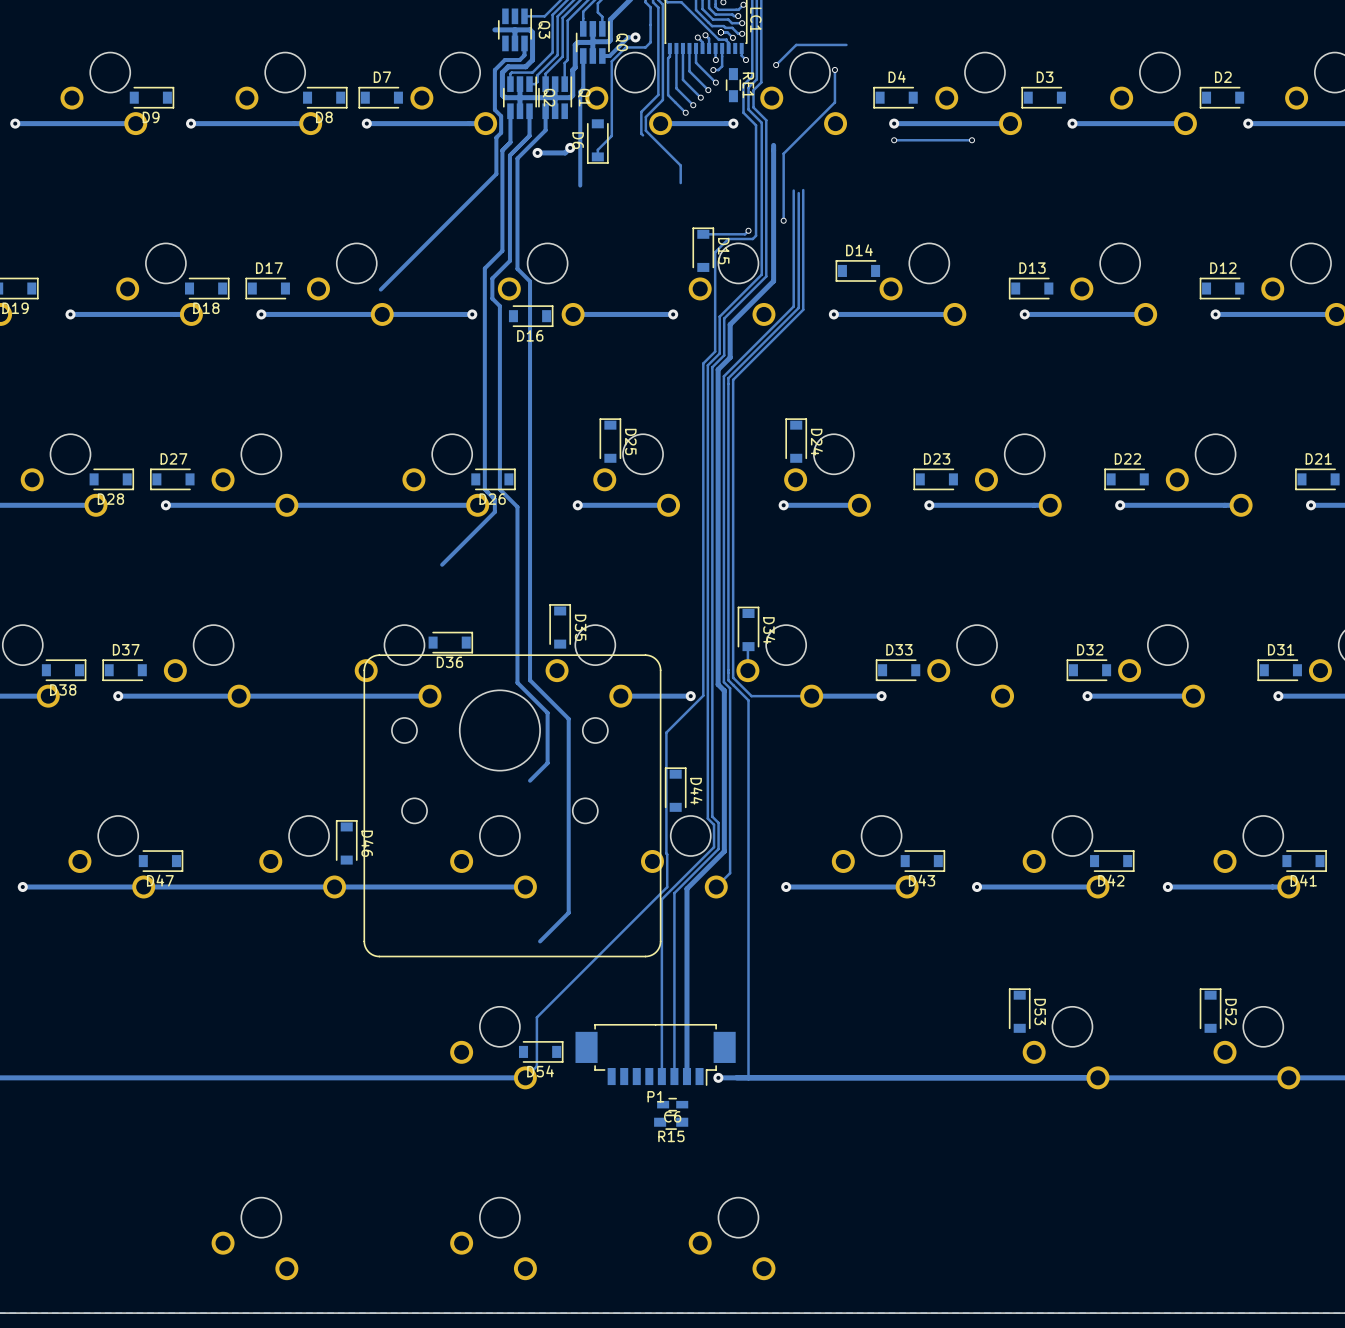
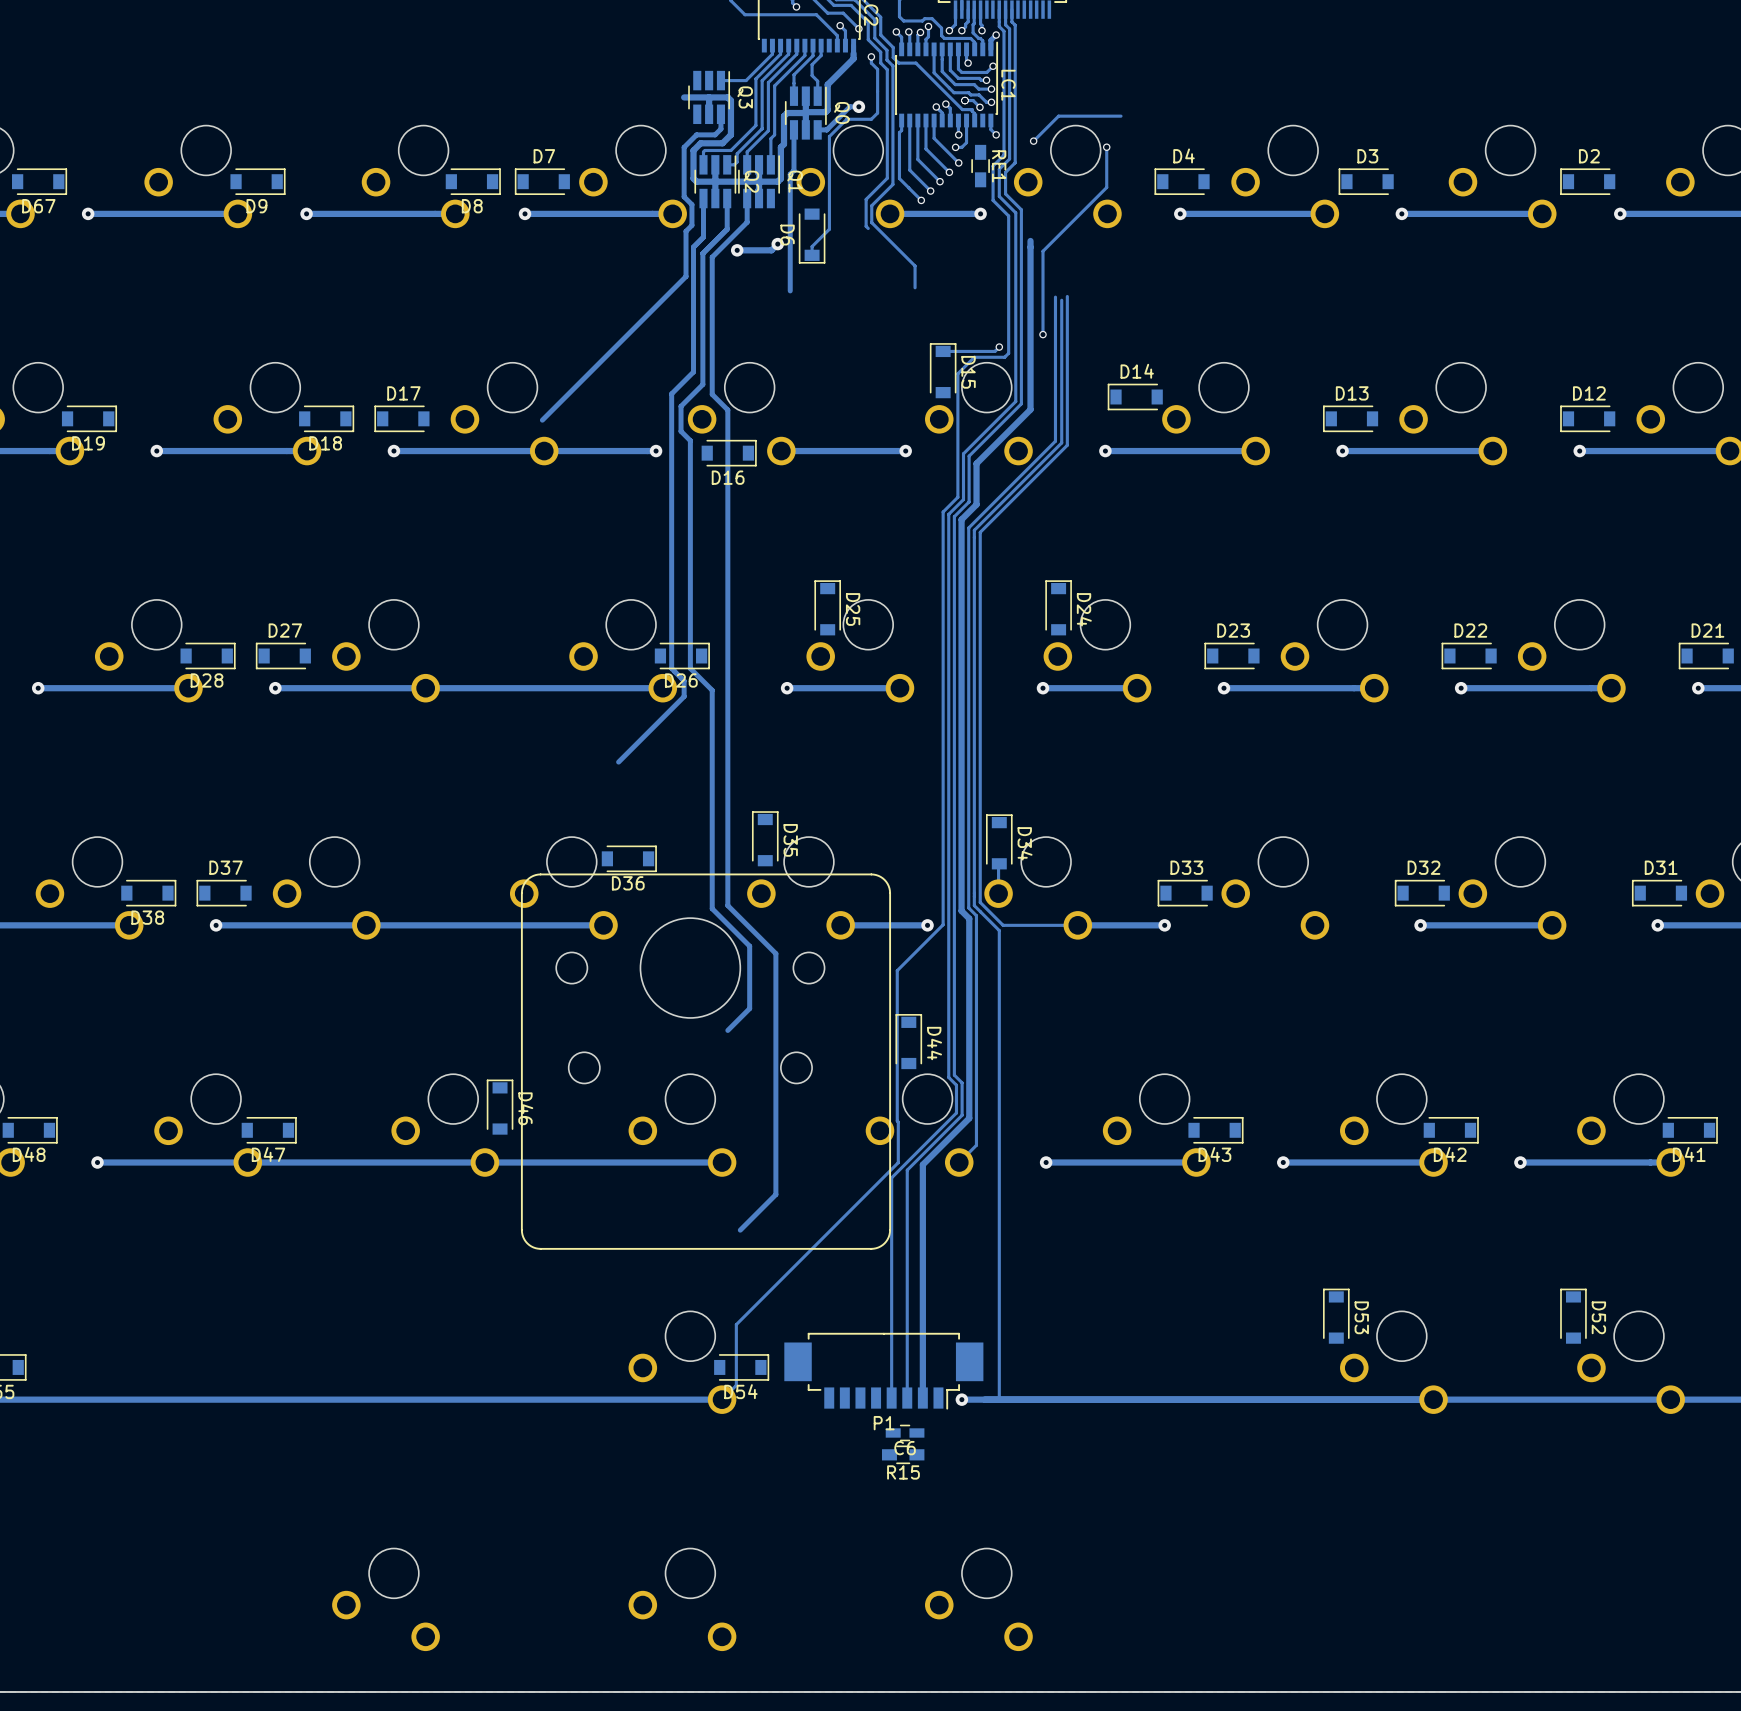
via: (894, 140) -> none
track: (972, 140) (894, 140) -> none
via: (972, 140) -> none

